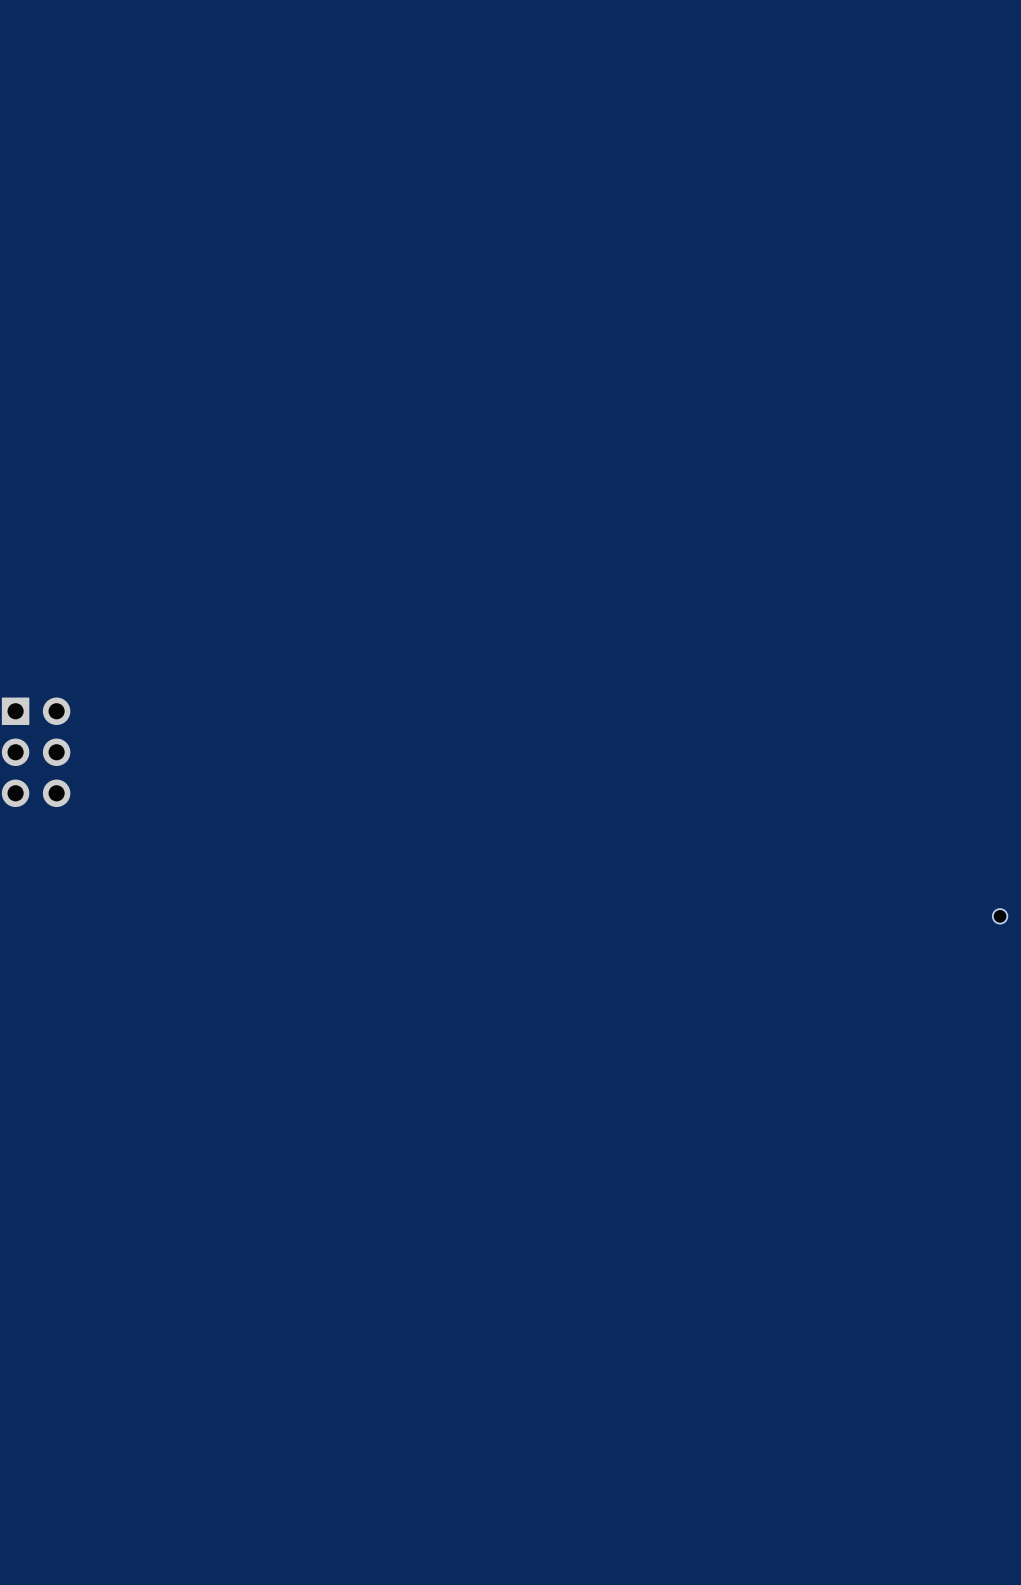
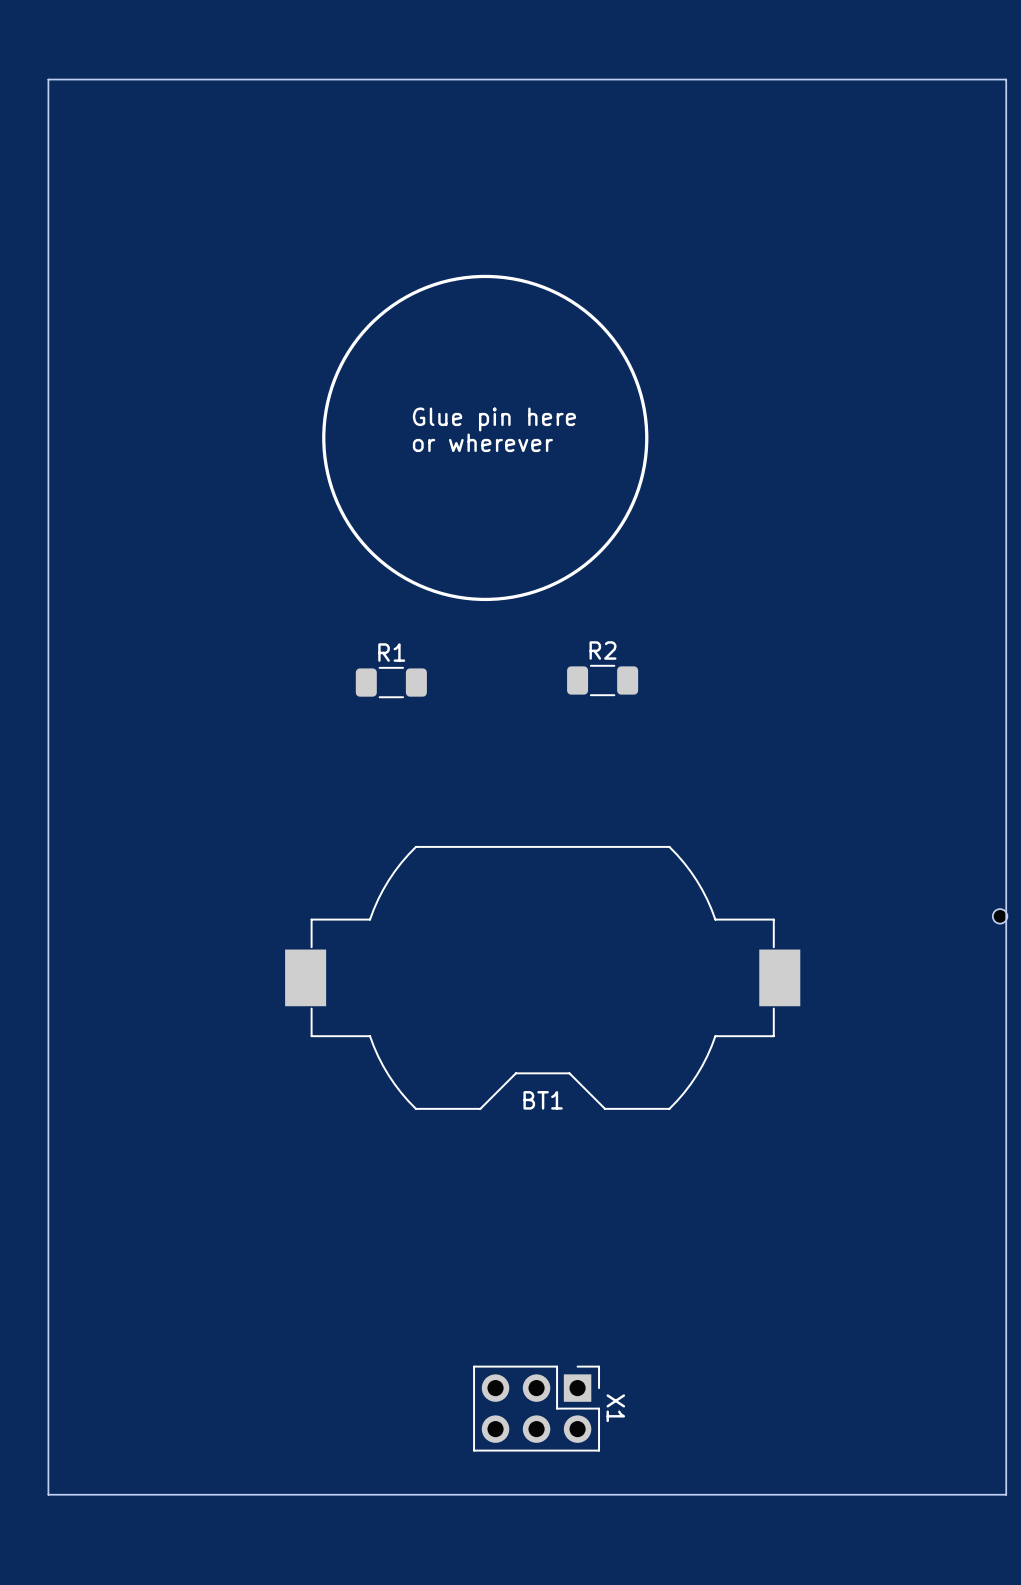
board edge: none -> (1006, 79) (48, 79) (48, 1494) (1006, 1494) (1006, 79)
drawing: none -> [322, 274, 649, 602]
text: none -> Glue pin here (494, 419)
text: none -> or wherever (482, 442)
R2: none -> (602, 680)
R1: none -> (391, 682)
part: (36, 752) -> none
BT1: none -> (542, 977)
X1: none -> (536, 1408)

